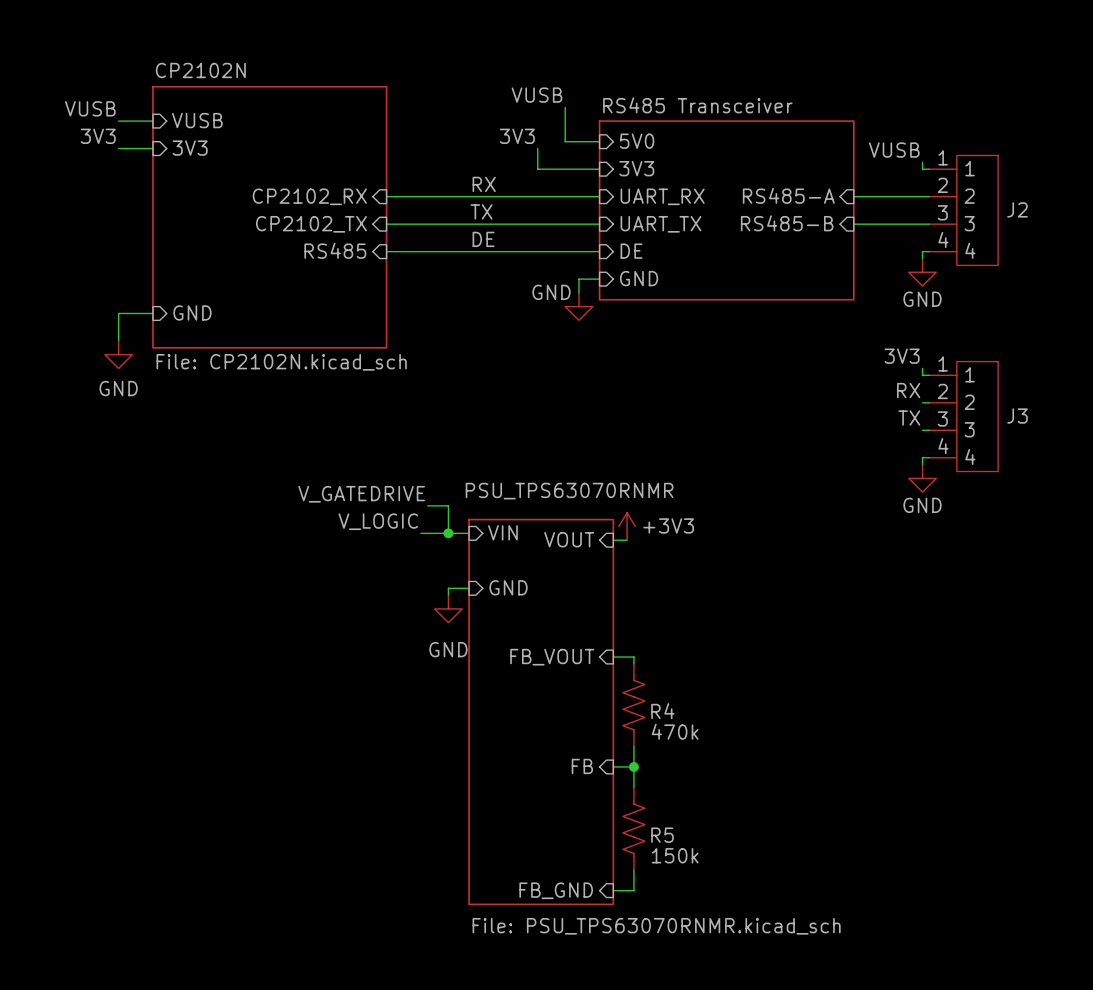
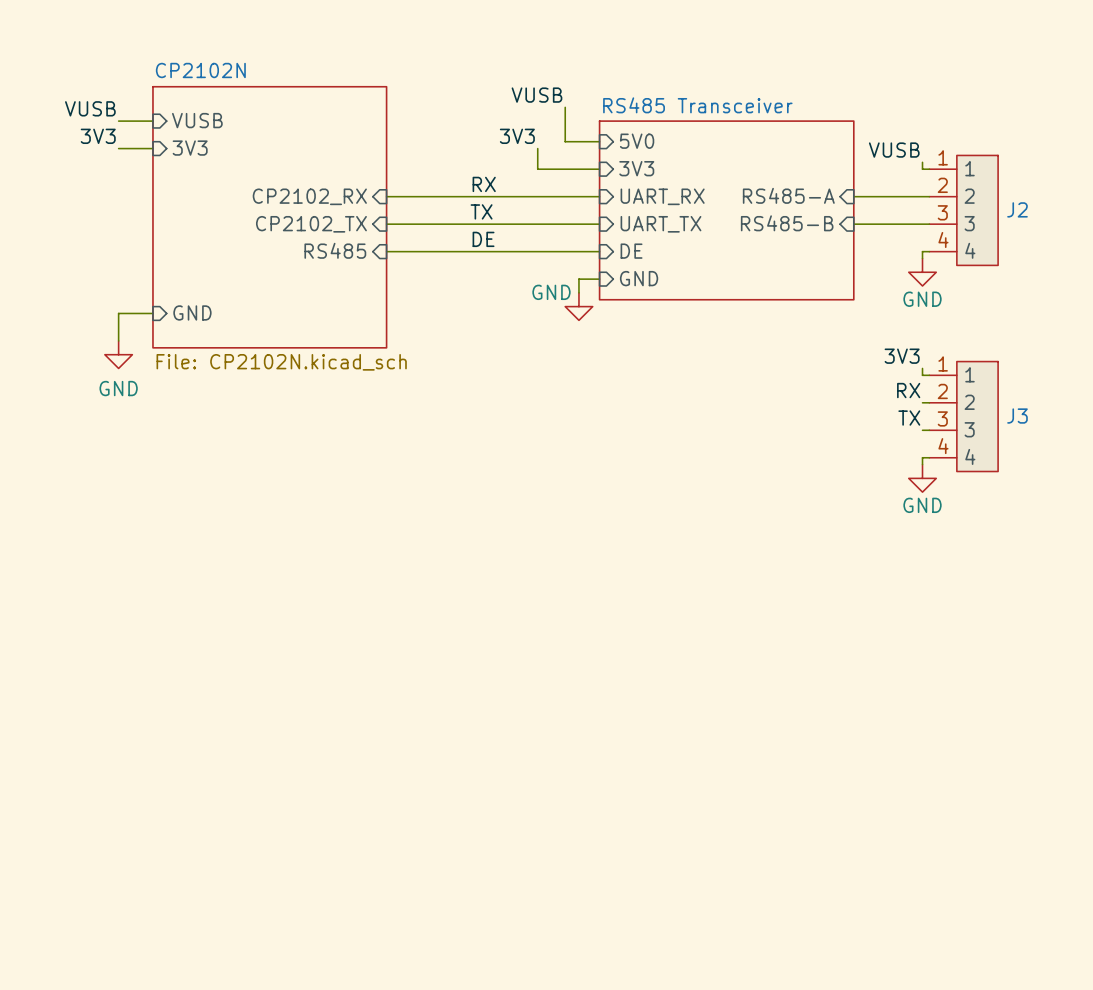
label: V_GATEDRIVE (361, 494) -> none
wire: (427, 505) (448, 505) (448, 533) -> none
label: V_LOGIC (378, 521) -> none
power symbol: +3V3 (627, 526) -> none
sheet pin: VIN (502, 532) -> none
wire: (420, 533) (469, 533) -> none
junction: (448, 533) -> none
sheet pin: VOUT (569, 539) -> none
wire: (613, 540) (627, 540) -> none
sheet pin: GND (508, 587) -> none
wire: (469, 588) (448, 588) (448, 595) -> none
power symbol: GND (448, 608) -> none
sheet pin: FB_VOUT (552, 657) -> none
wire: (613, 657) (633, 657) (633, 663) -> none
R4: 470k (633, 705) -> none
sheet PSU_TPS63070RNMR: File: PSU_TPS63070RNMR.kicad_sch (541, 711) -> none
wire: (633, 746) (633, 787) -> none
sheet pin: FB (582, 766) -> none
wire: (613, 766) (633, 766) -> none
junction: (633, 766) -> none
R5: 150k (633, 828) -> none
wire: (633, 870) (633, 890) (613, 890) -> none
sheet pin: FB_GND (556, 890) -> none

